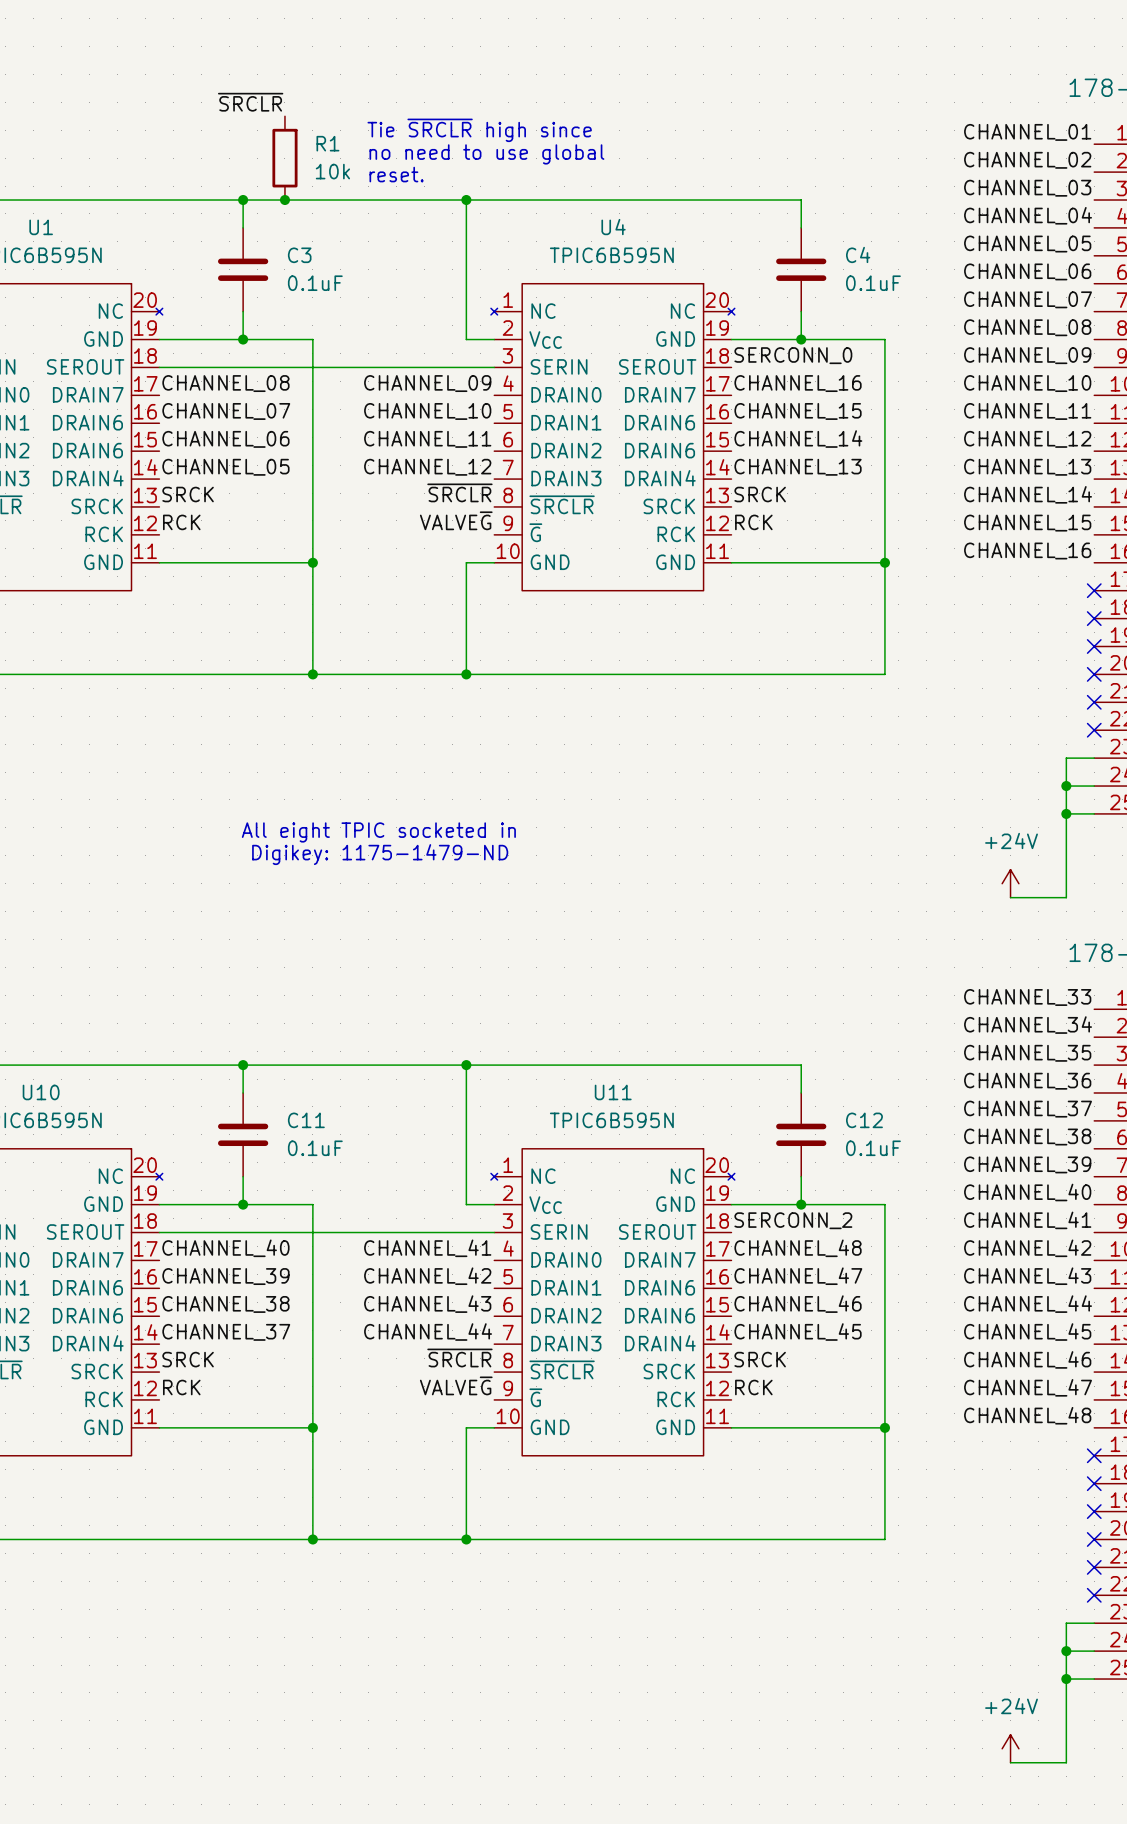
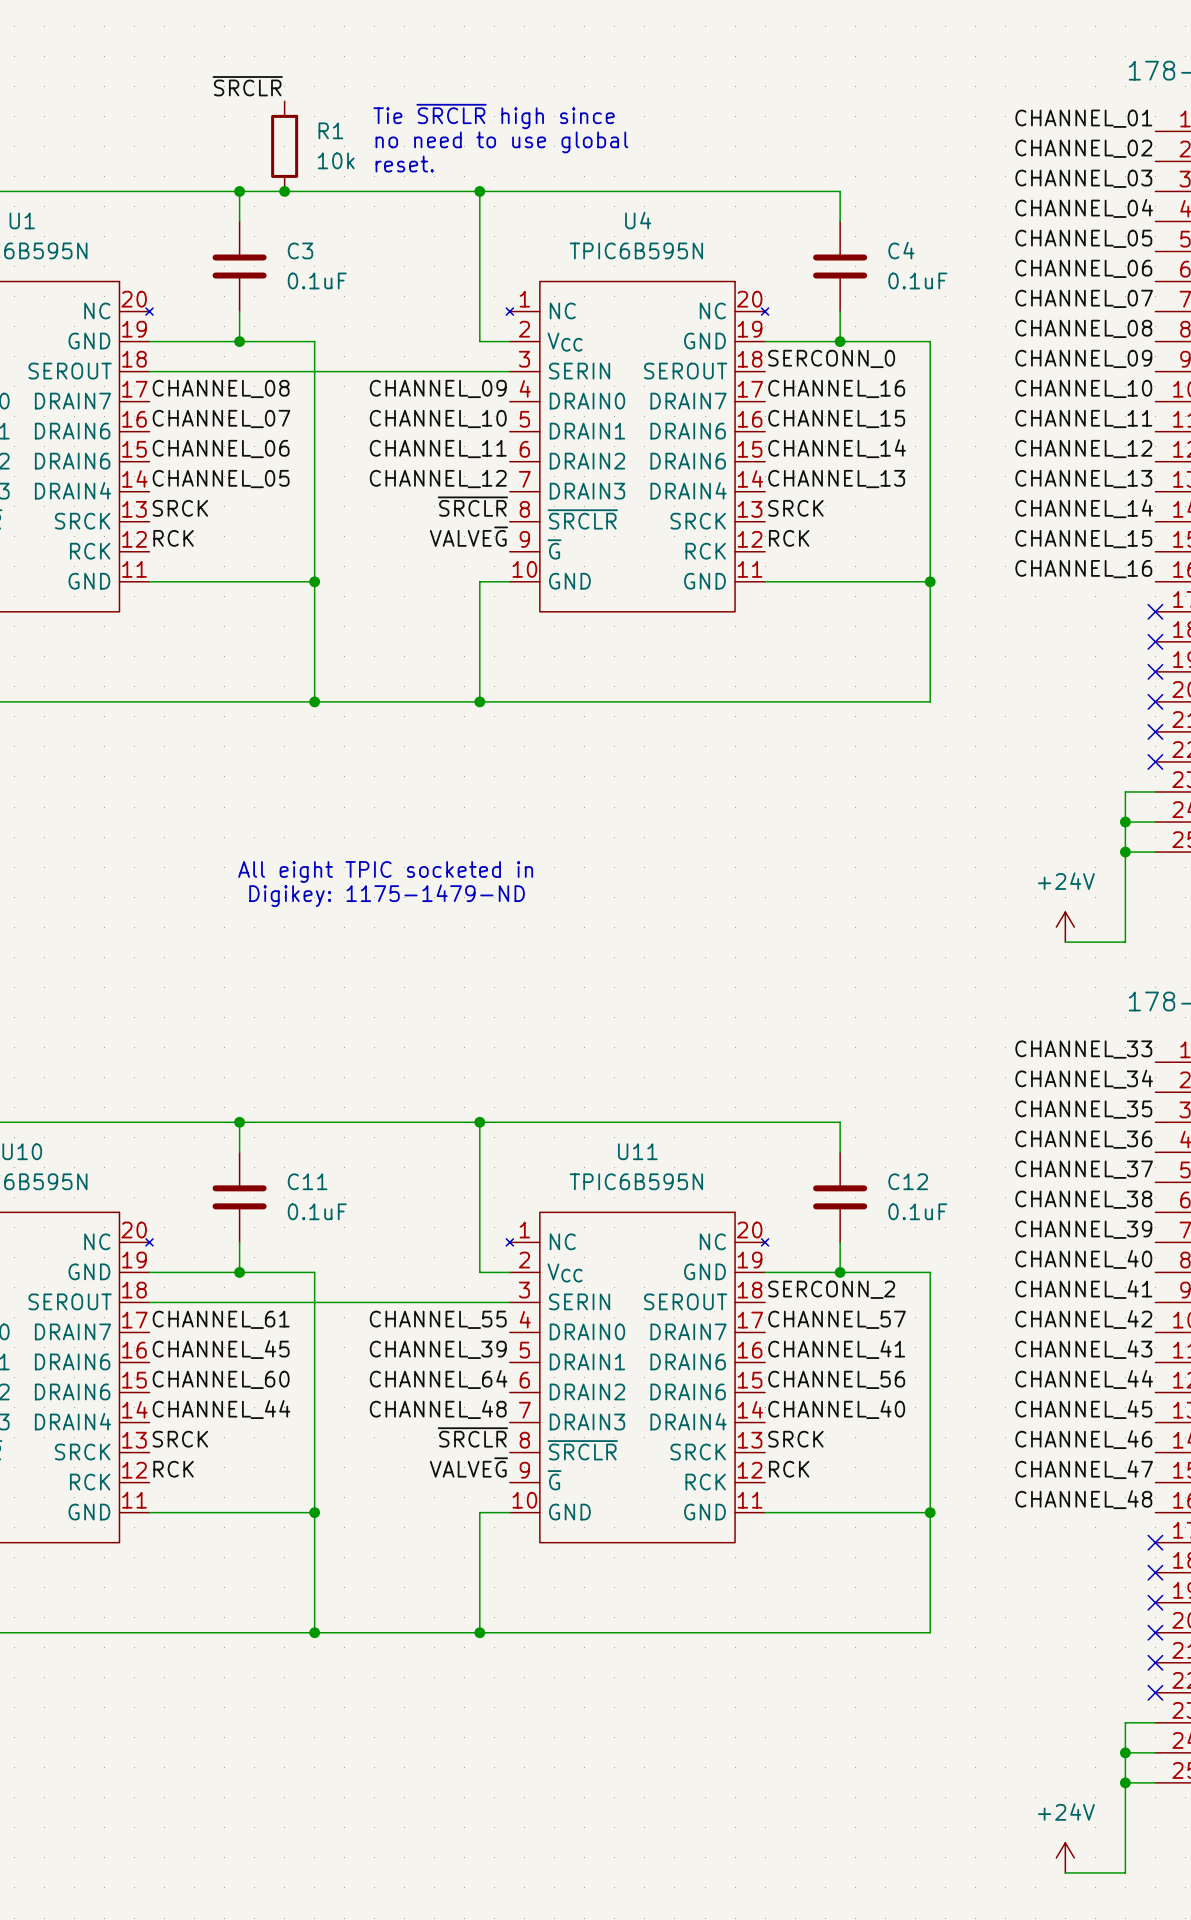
label: CHANNEL_40 (225, 1248) -> CHANNEL_61 (221, 1319)
label: CHANNEL_41 (427, 1248) -> CHANNEL_55 (438, 1319)
label: CHANNEL_48 (798, 1248) -> CHANNEL_57 (837, 1319)
label: CHANNEL_39 (225, 1276) -> CHANNEL_45 (221, 1349)
label: CHANNEL_42 (427, 1276) -> CHANNEL_39 (438, 1349)
label: CHANNEL_47 (798, 1276) -> CHANNEL_41 (836, 1349)
label: CHANNEL_38 (225, 1304) -> CHANNEL_60 (221, 1379)
label: CHANNEL_43 (427, 1304) -> CHANNEL_64 (438, 1379)
label: CHANNEL_46 (798, 1304) -> CHANNEL_56 (836, 1379)
label: CHANNEL_37 (226, 1332) -> CHANNEL_44 (221, 1409)
label: CHANNEL_44 (428, 1332) -> CHANNEL_48 (438, 1409)
label: CHANNEL_45 (798, 1332) -> CHANNEL_40 (836, 1409)

